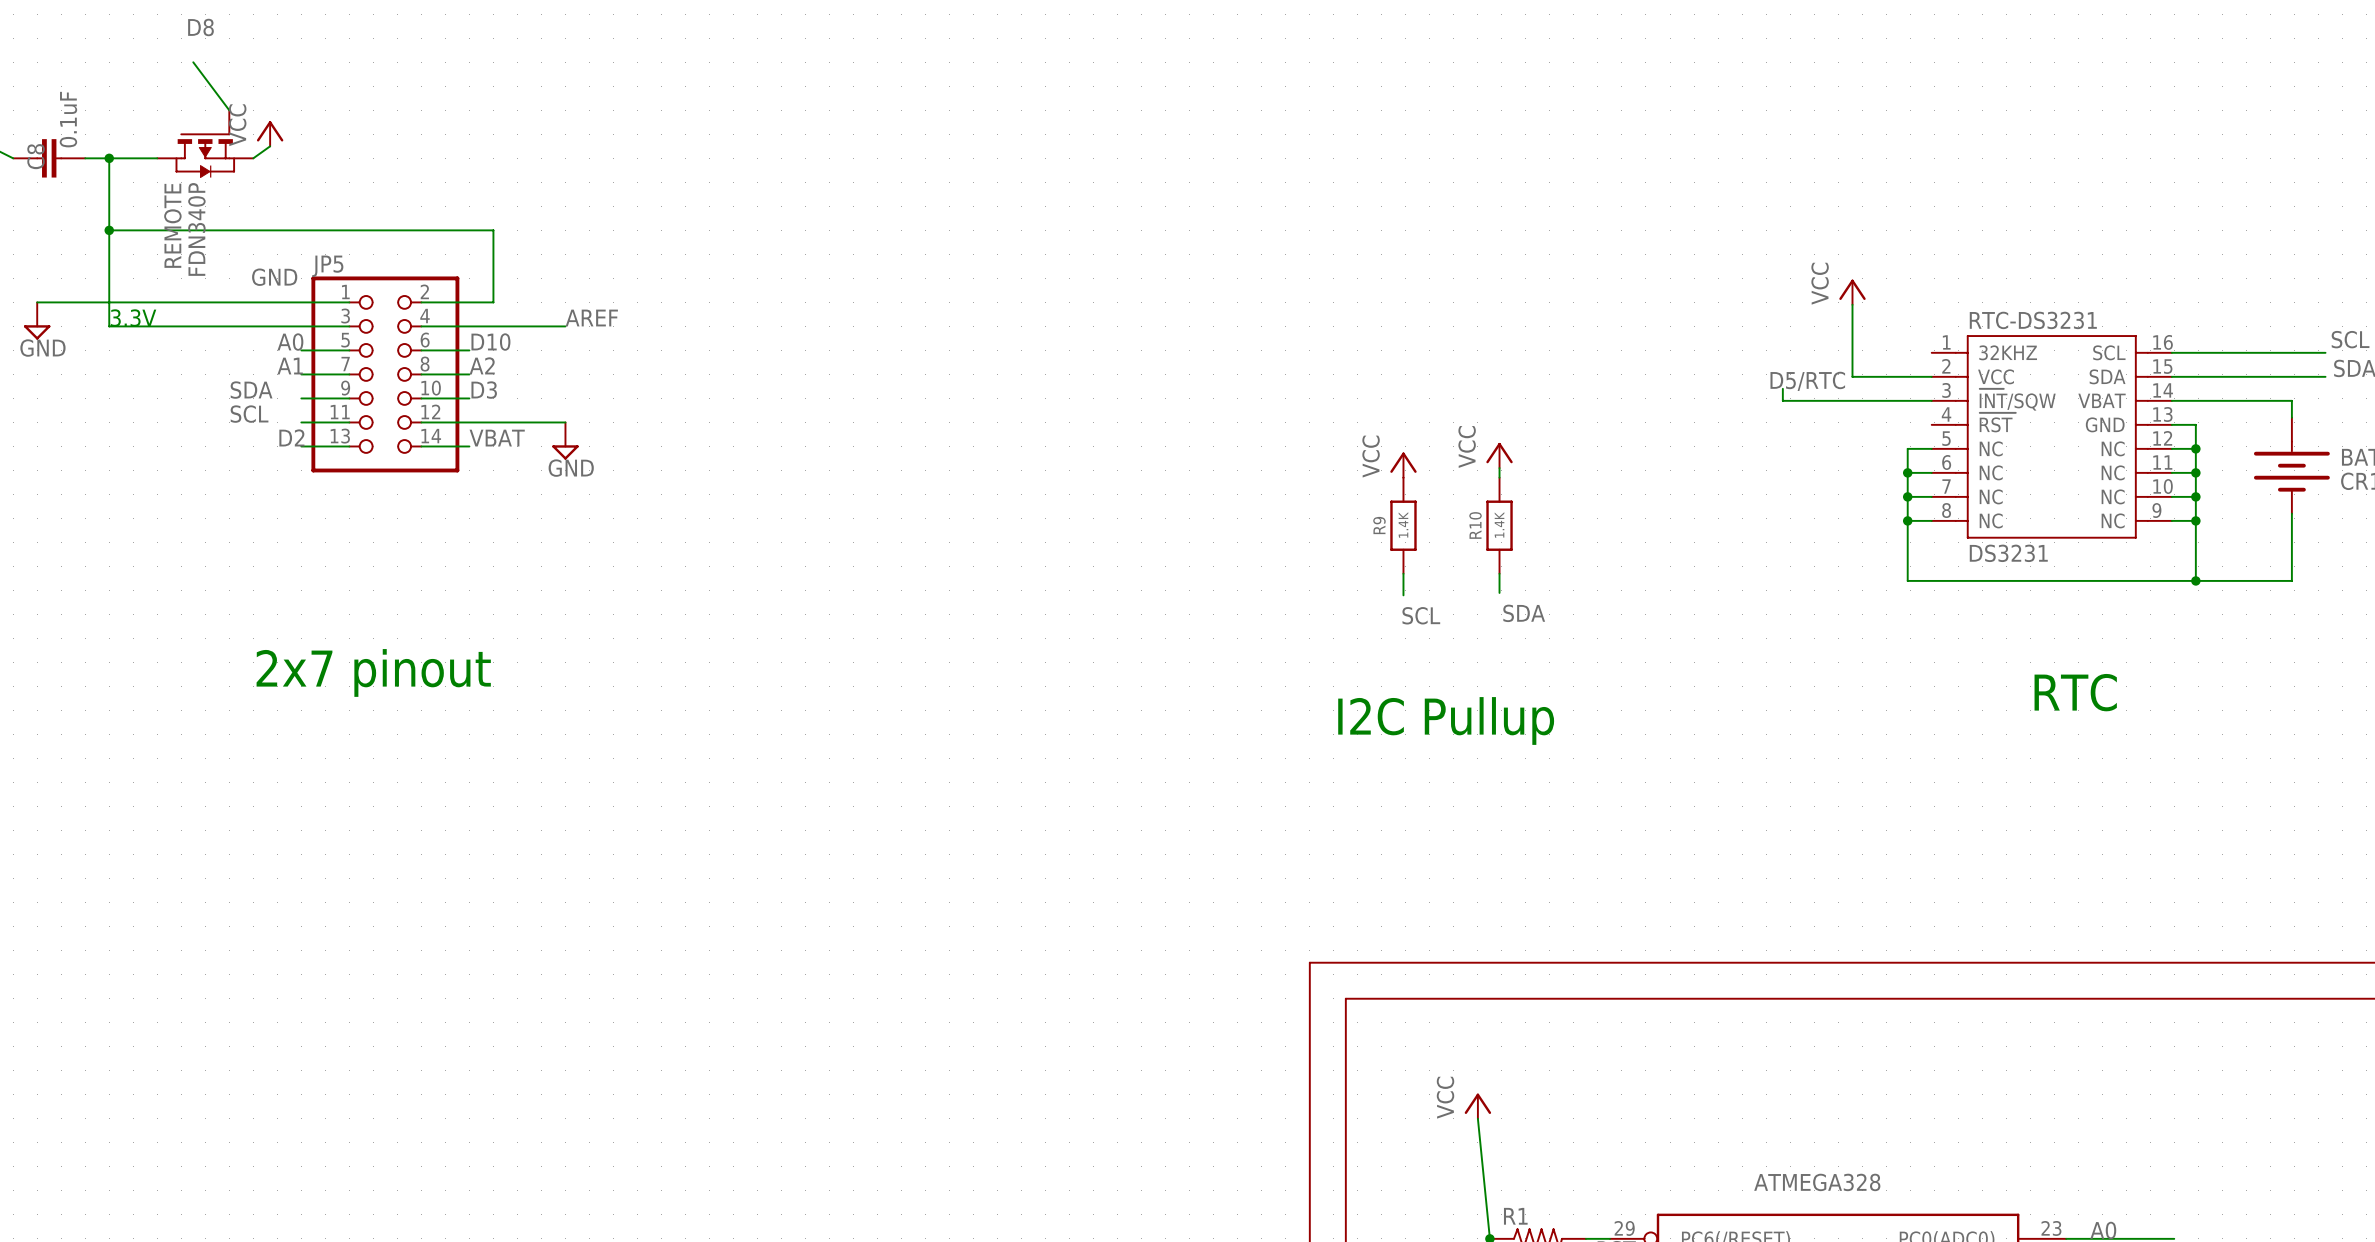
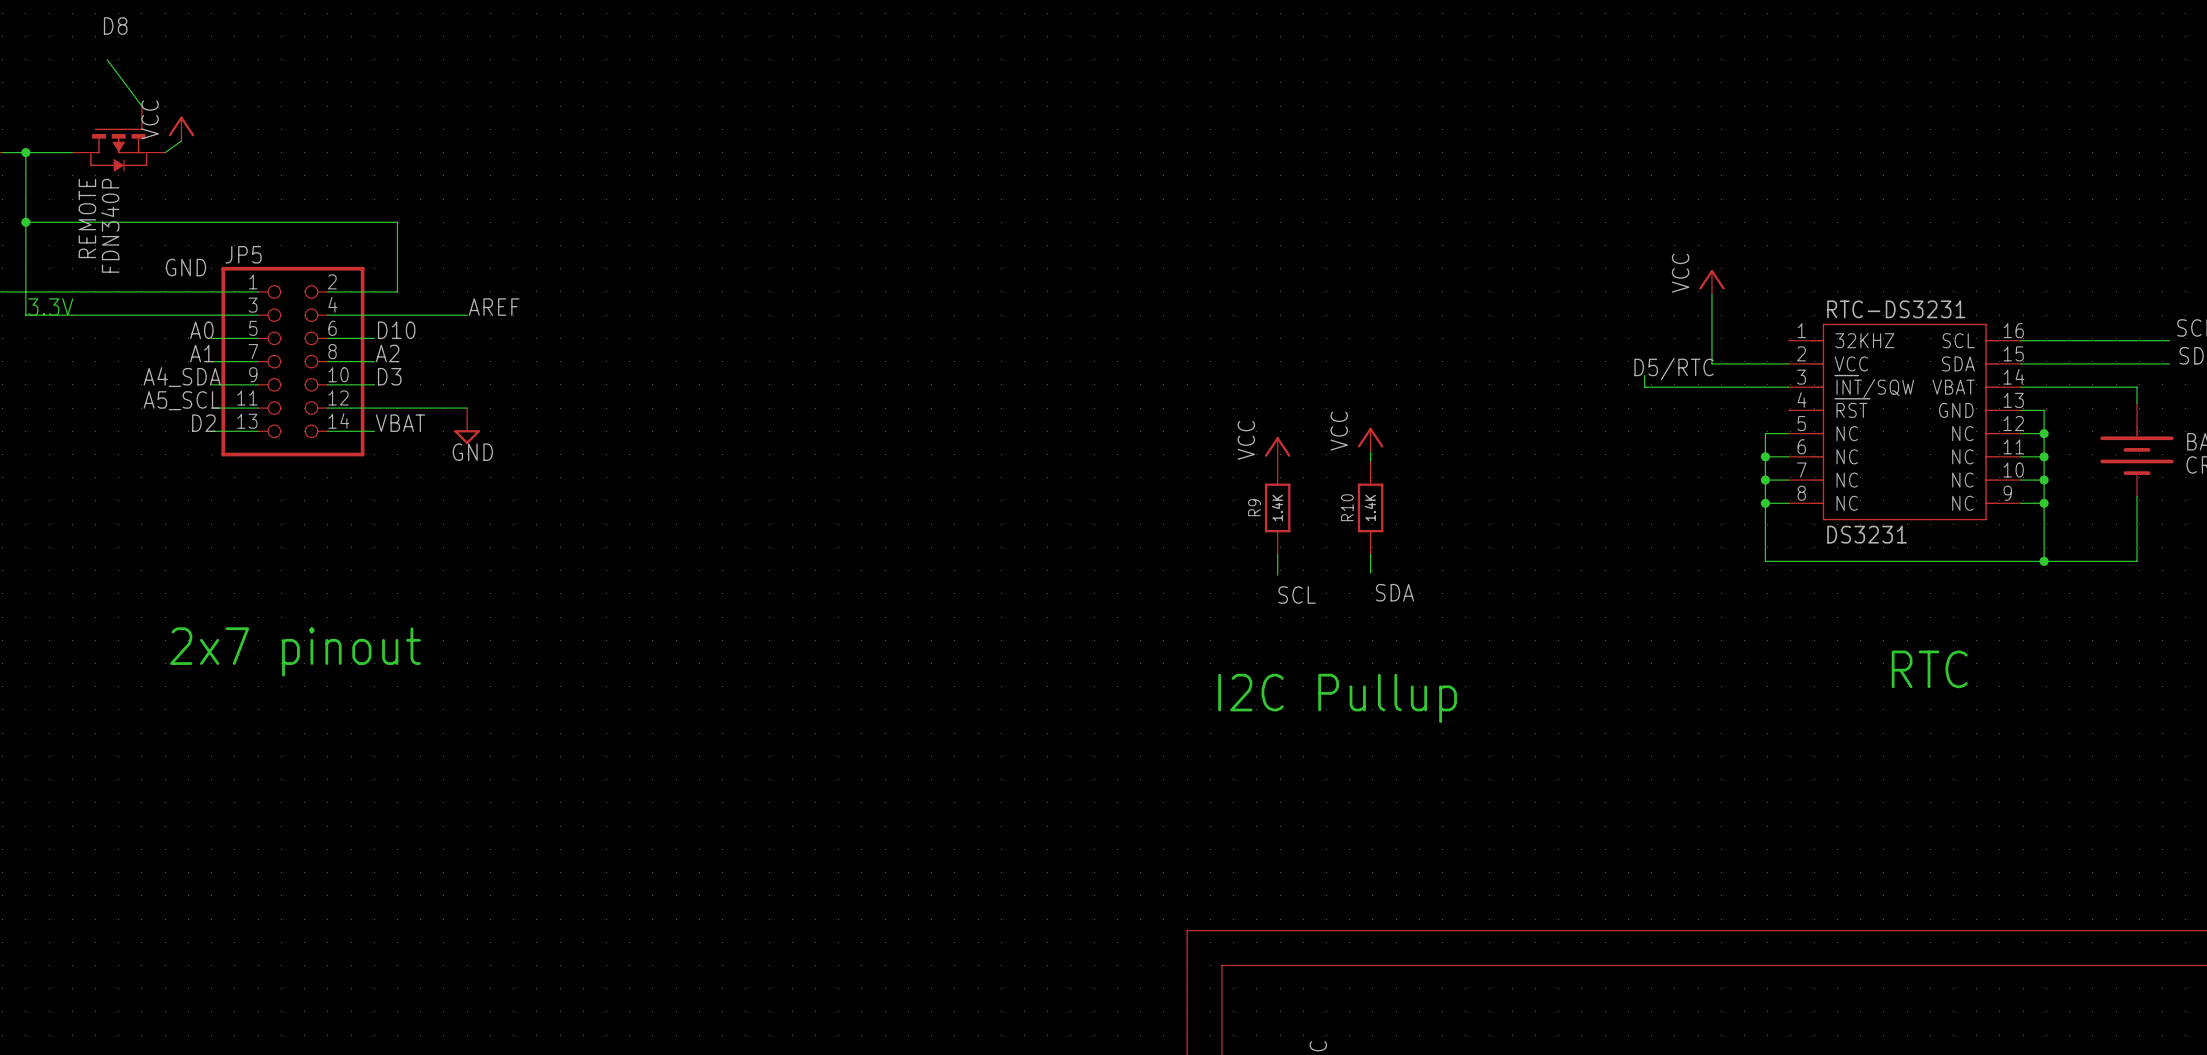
label: SDA (251, 390) -> A4_SDA (182, 377)
label: SCL (249, 414) -> A5_SCL (181, 400)

